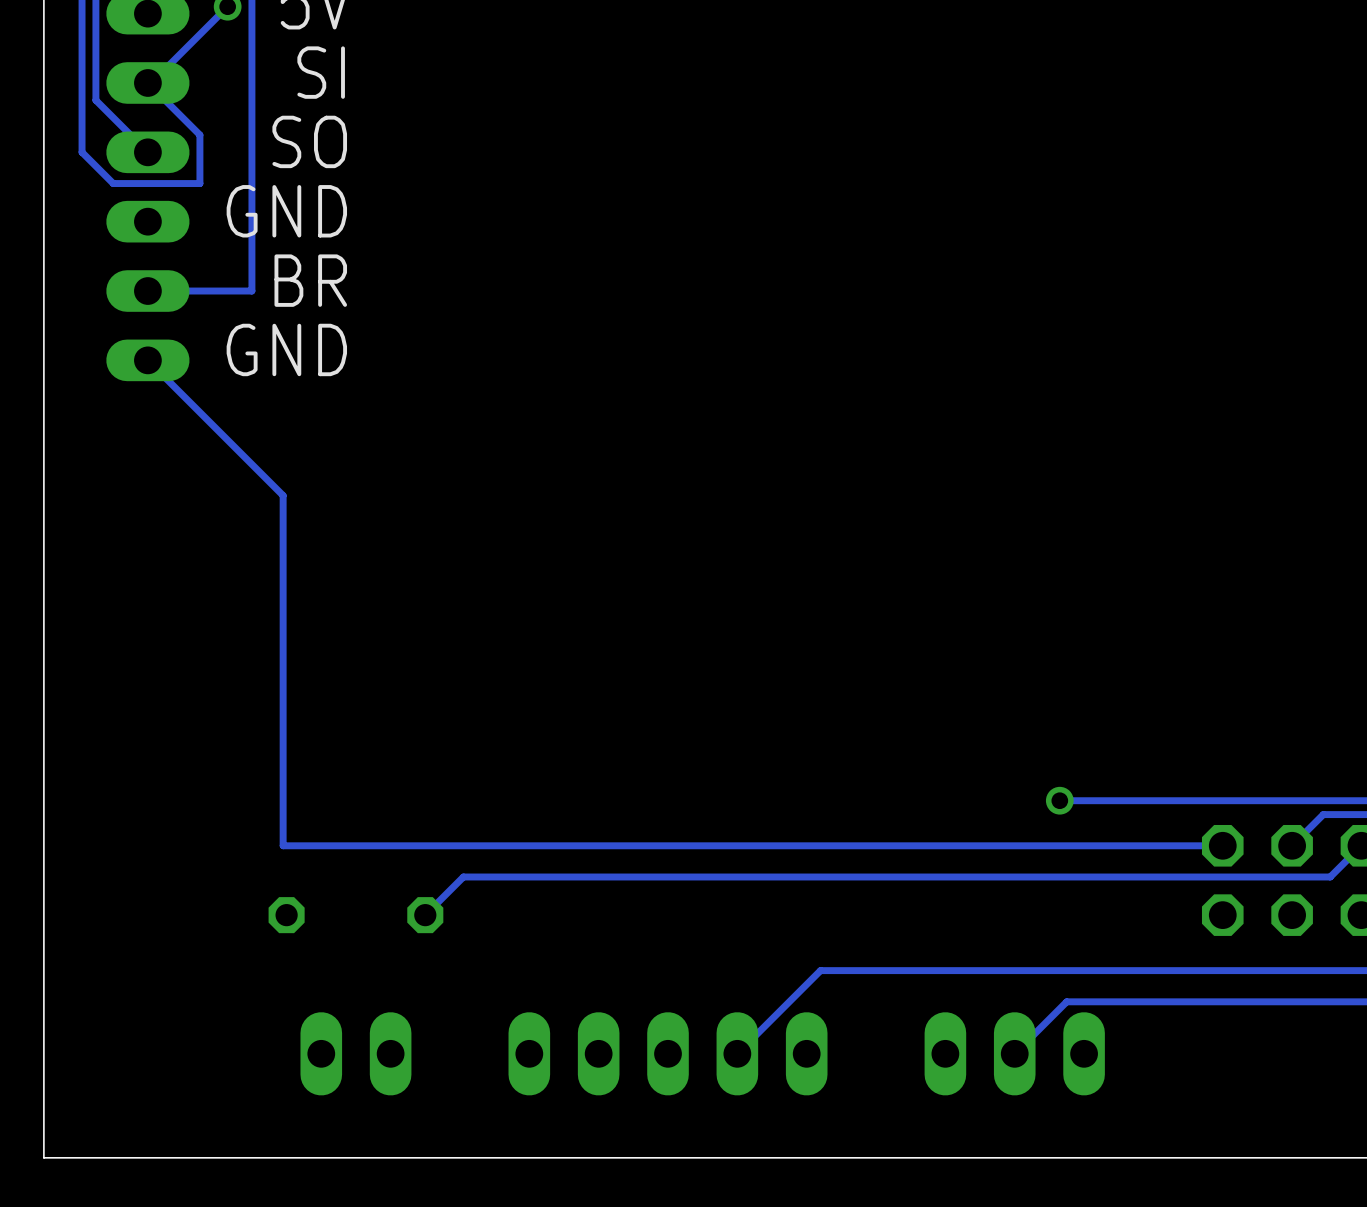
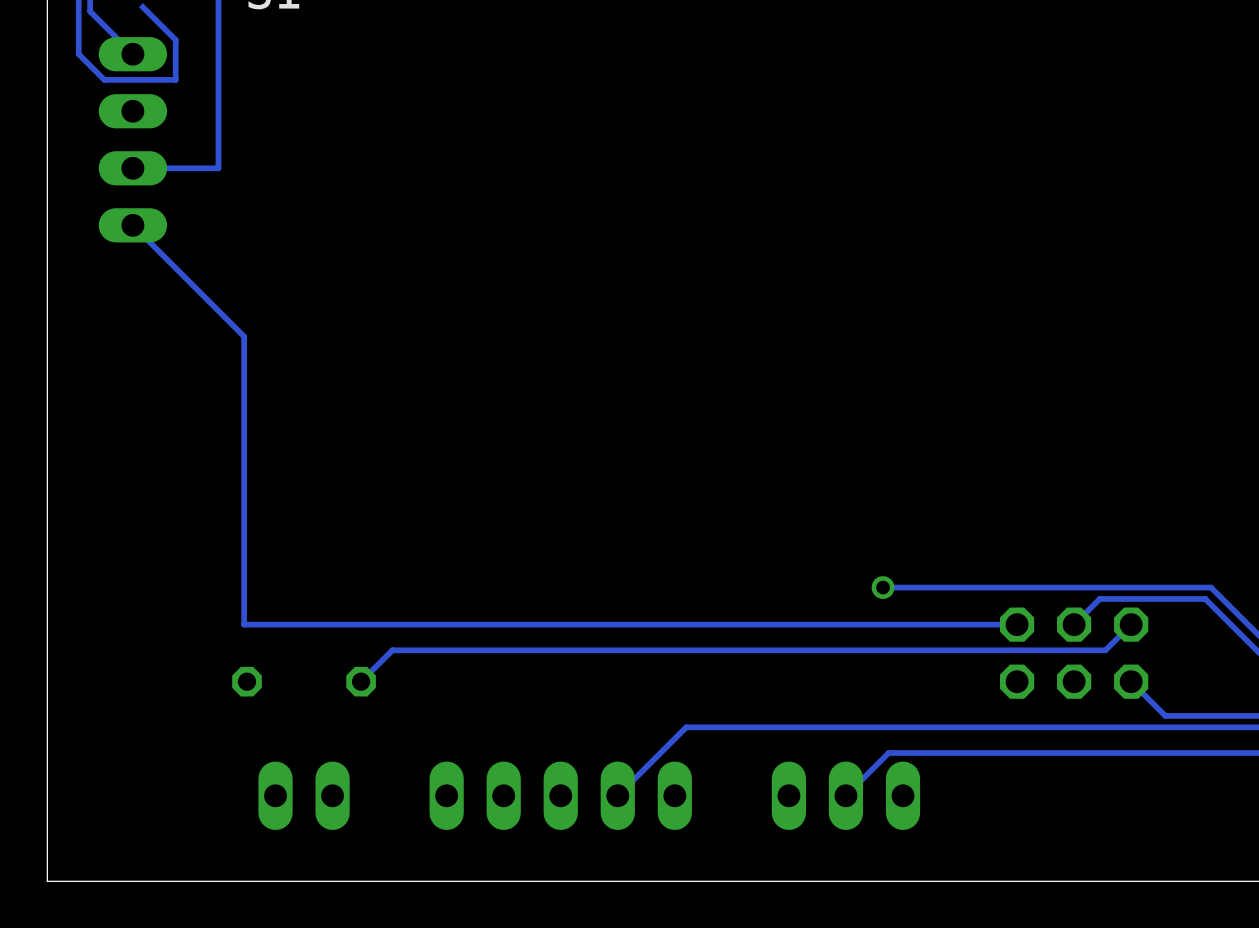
text: SO (309, 141) -> none
text: GND (286, 211) -> none
text: BR (310, 280) -> none
text: GND (286, 349) -> none

